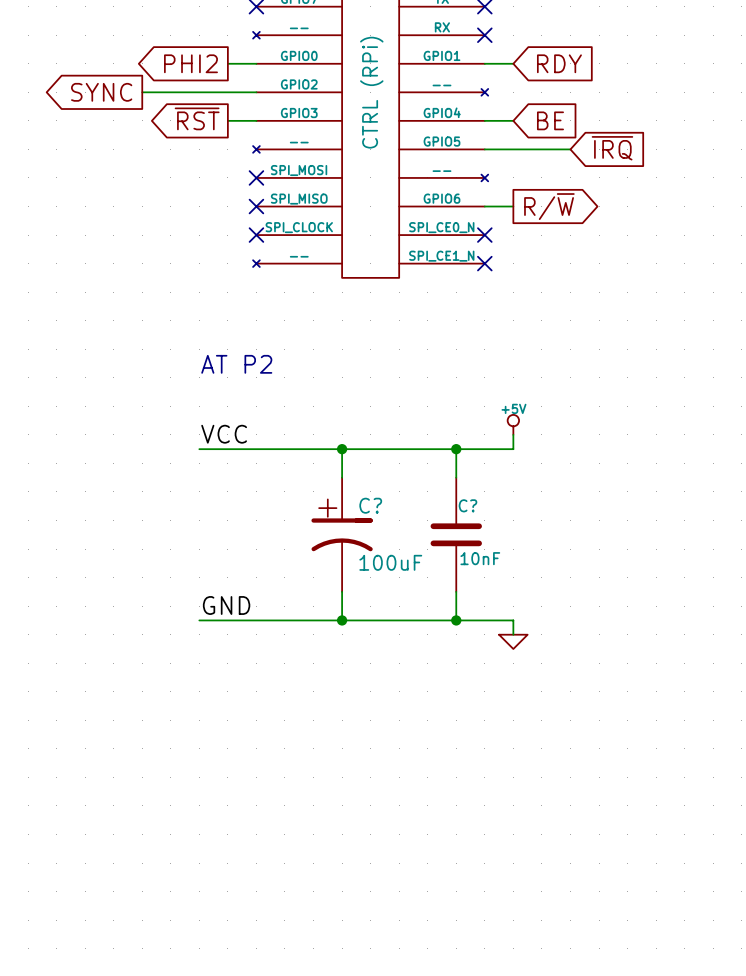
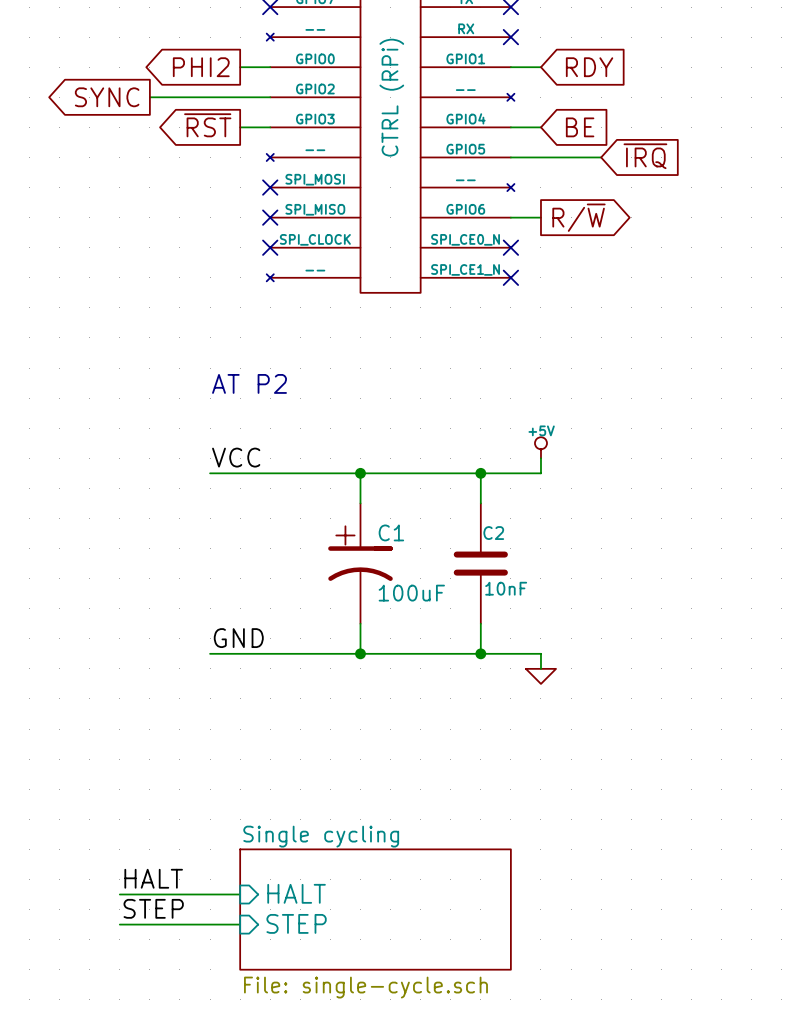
C? name: C? (370, 505) -> C1 (391, 532)
C? name: C? (467, 505) -> C2 (493, 533)
label: none -> HALT (153, 878)
wire: none -> (119, 894) (240, 894)
sheet pin: none -> HALT (296, 893)
label: none -> STEP (153, 908)
sheet Single cycling: none -> File: single-cycle.sch (375, 909)
sheet pin: none -> STEP (296, 923)
wire: none -> (119, 924) (240, 924)

